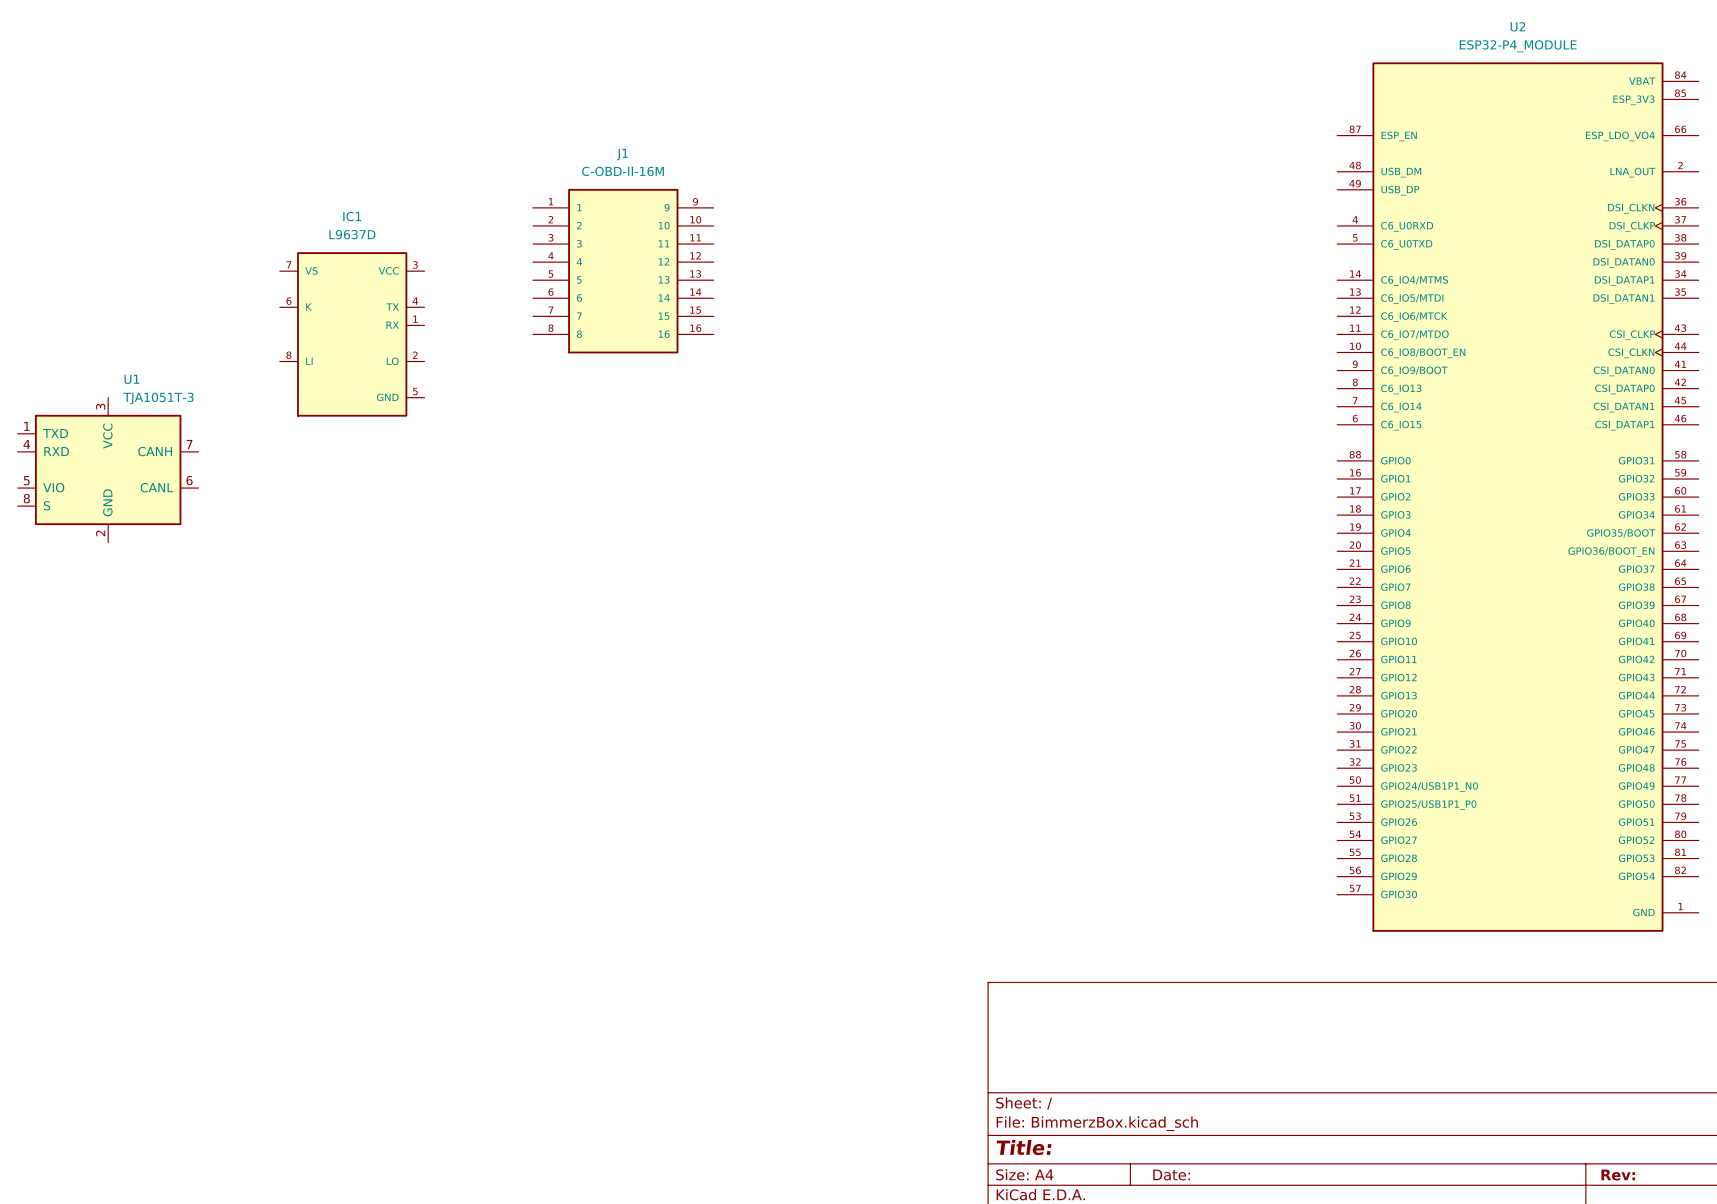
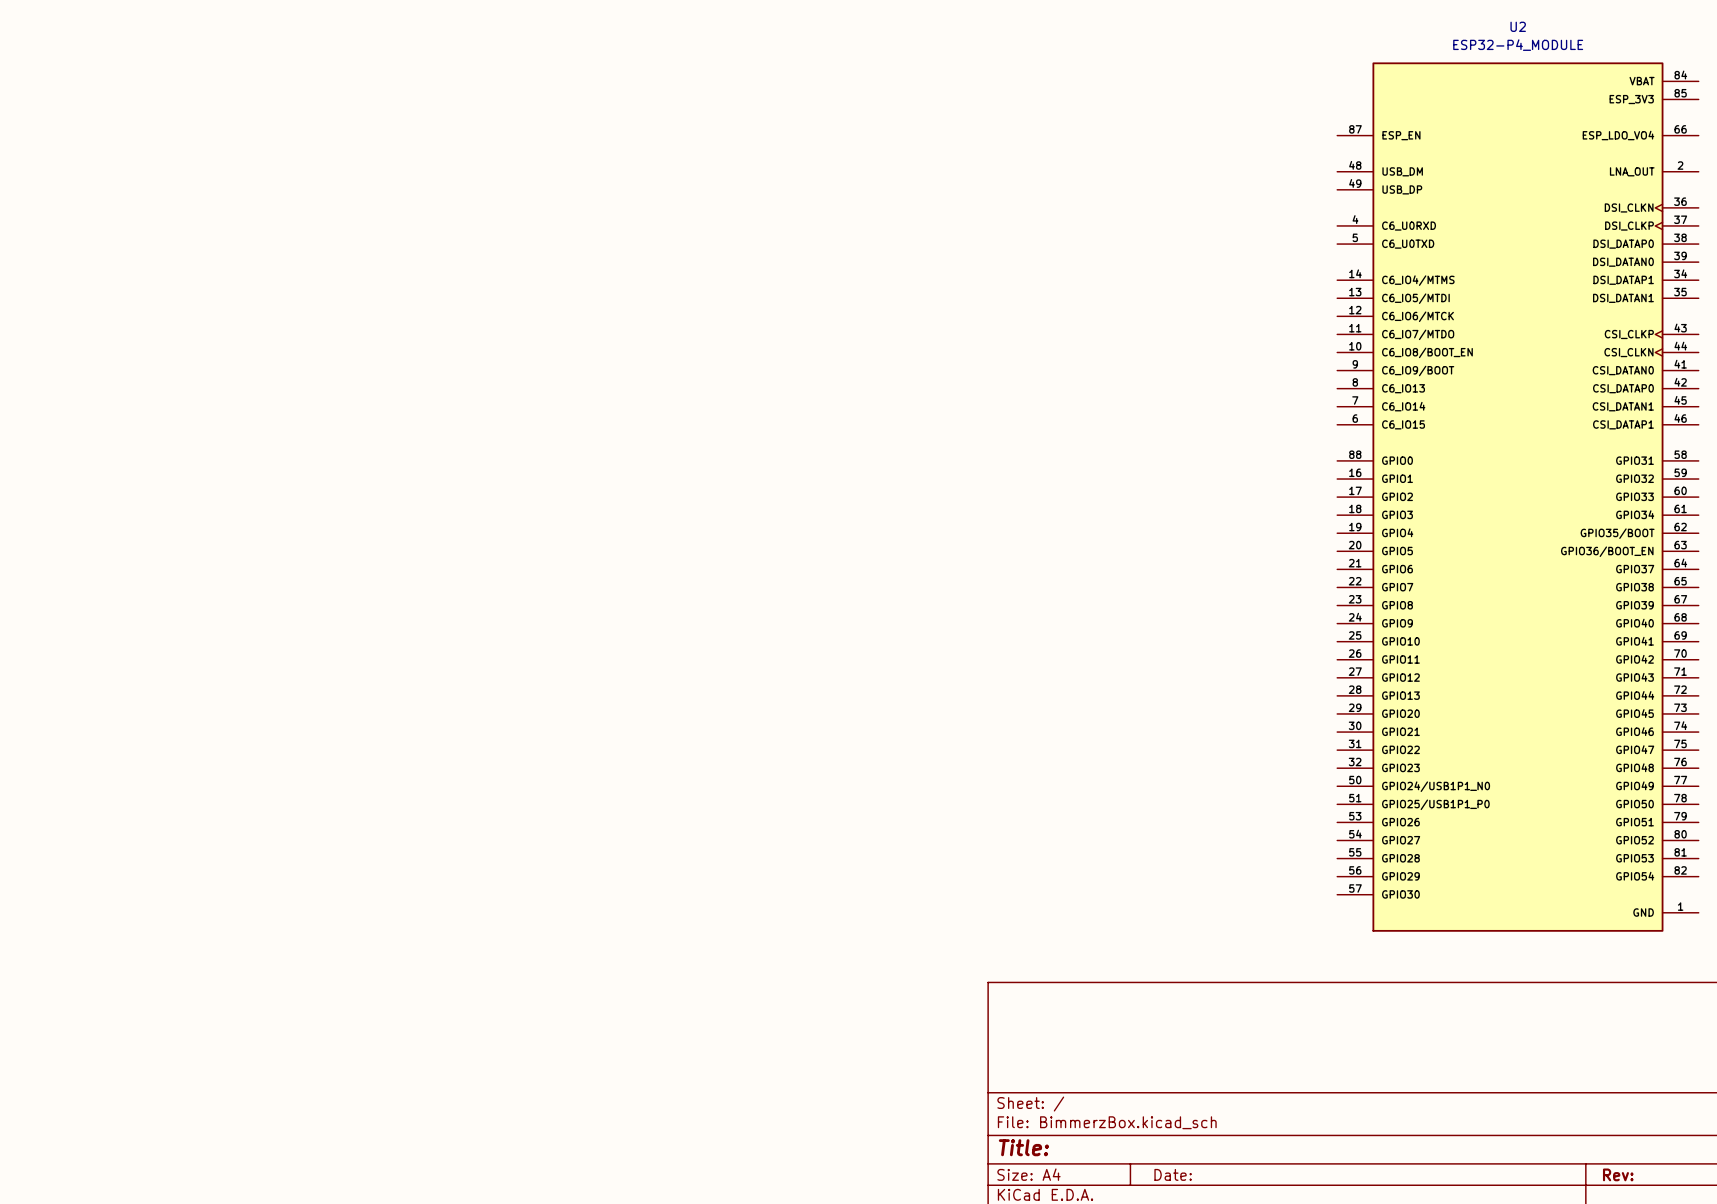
J1: C-OBD-II-16M (623, 271) -> none
IC1: L9637D (352, 334) -> none
U1: TJA1051T-3 (108, 469) -> none

